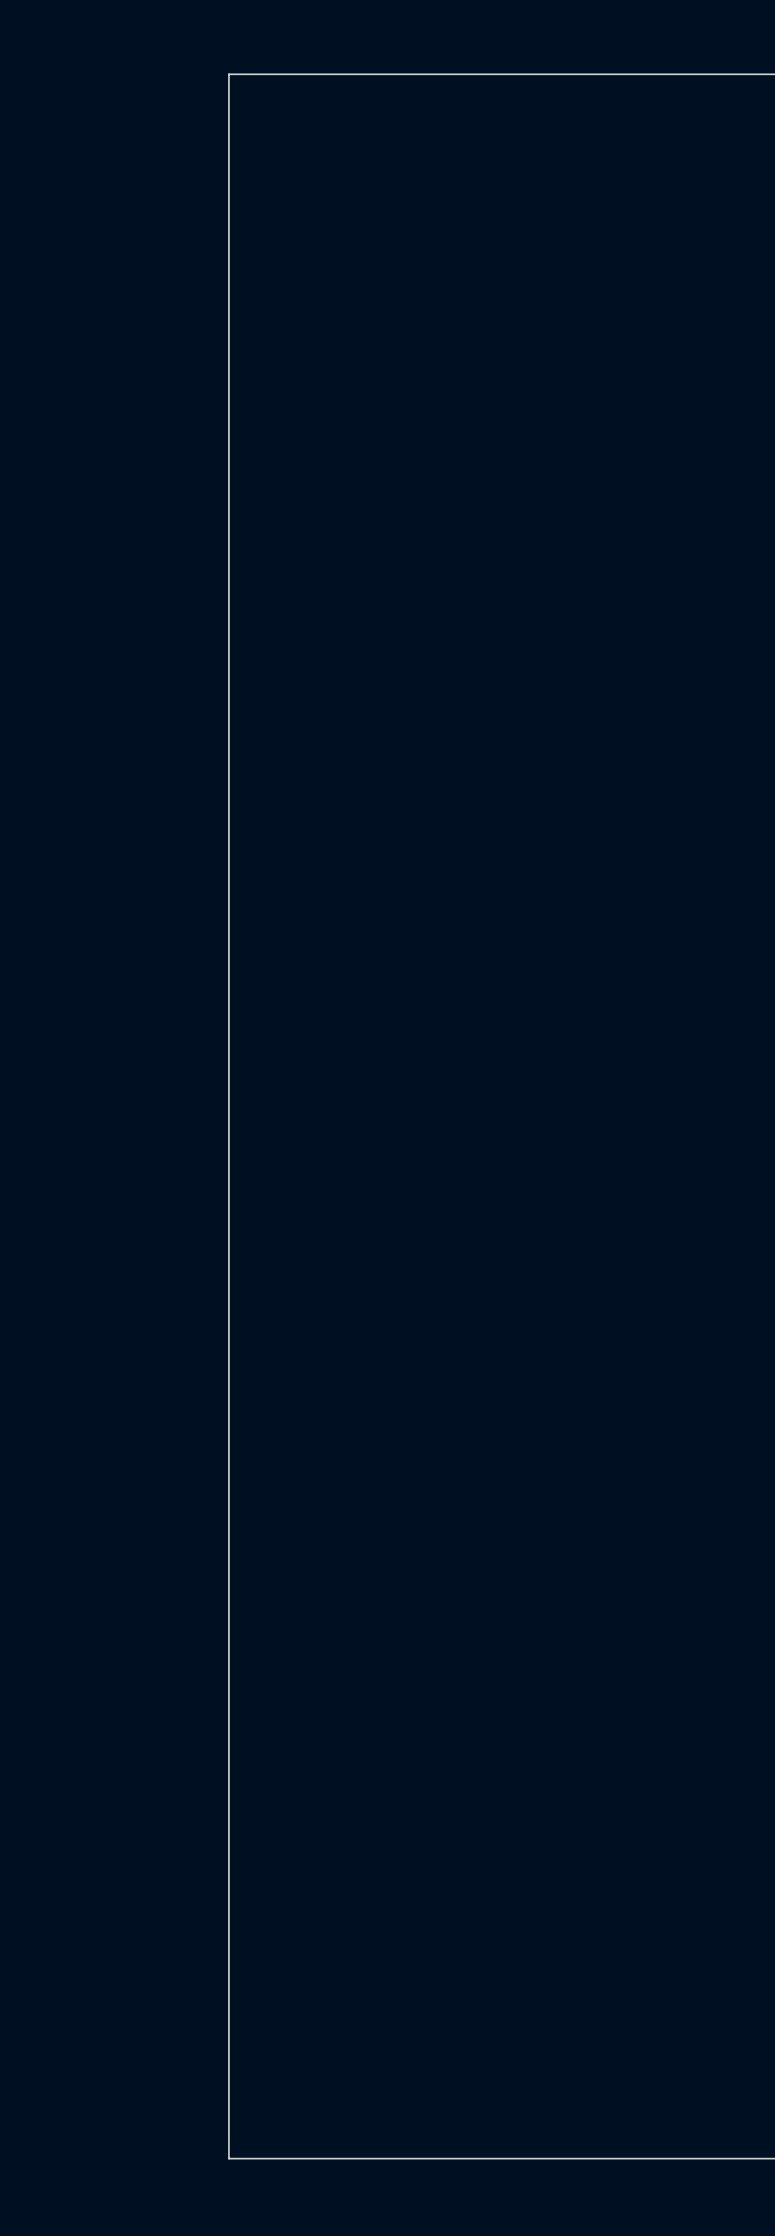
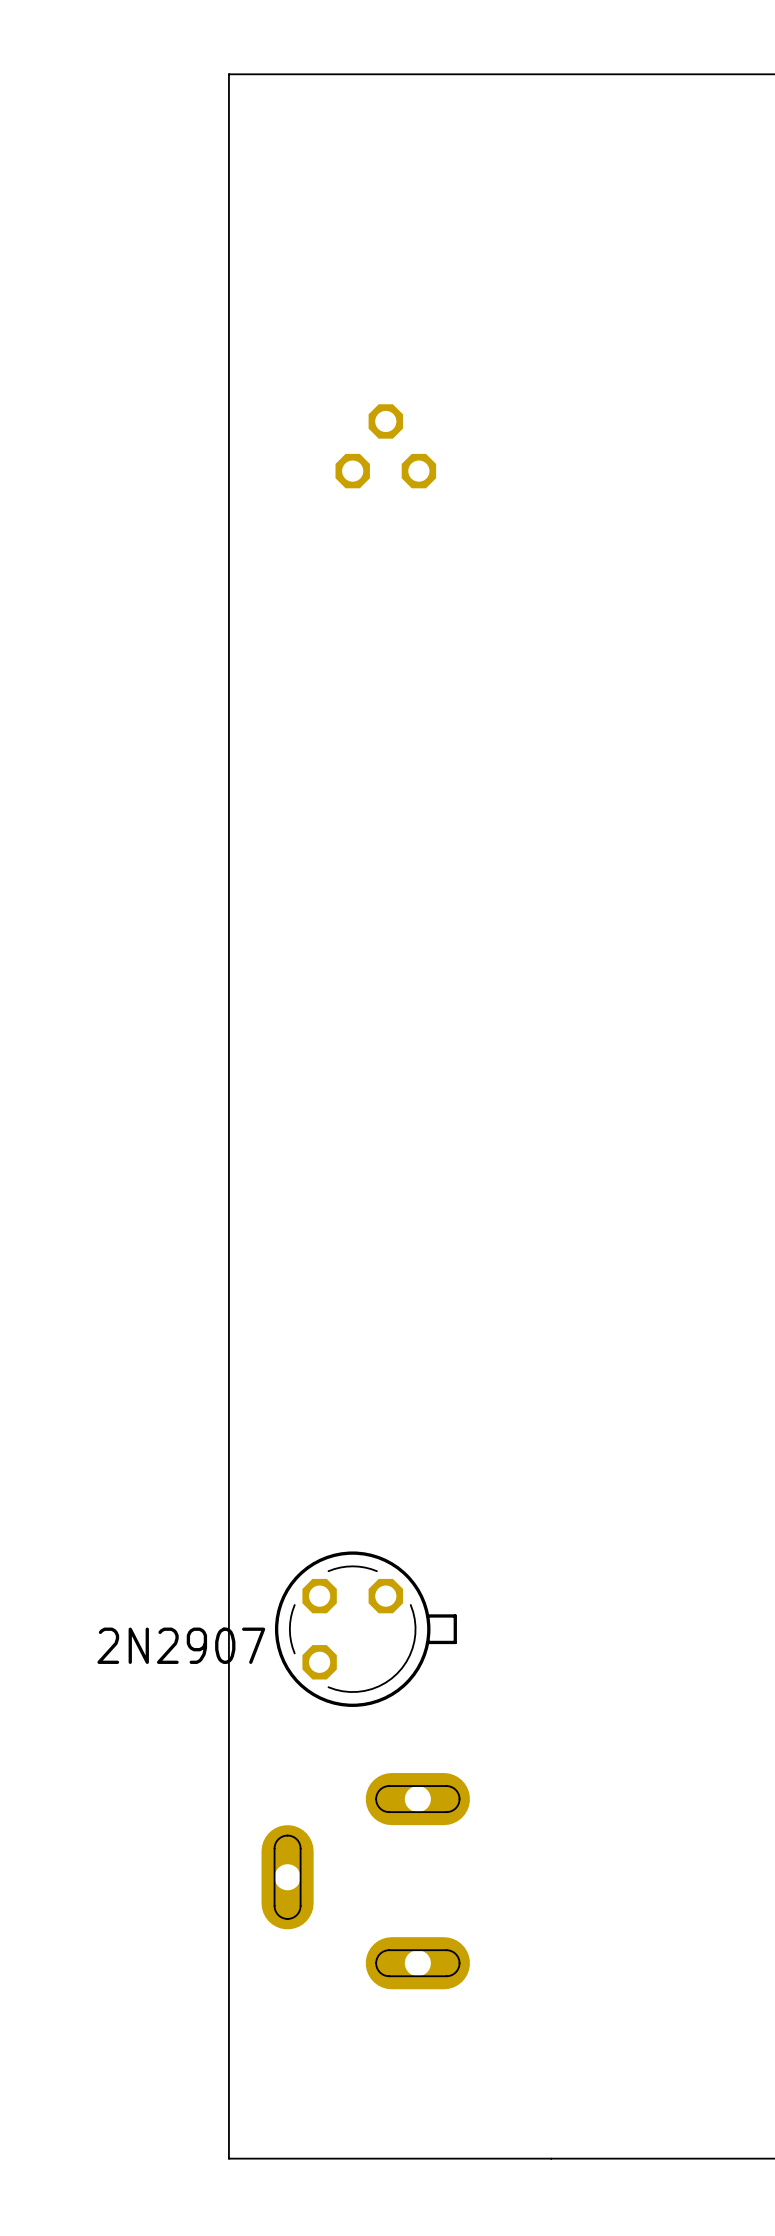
part: none -> (385, 446)
2N2907: none -> (365, 1629)
part: none -> (365, 1881)

